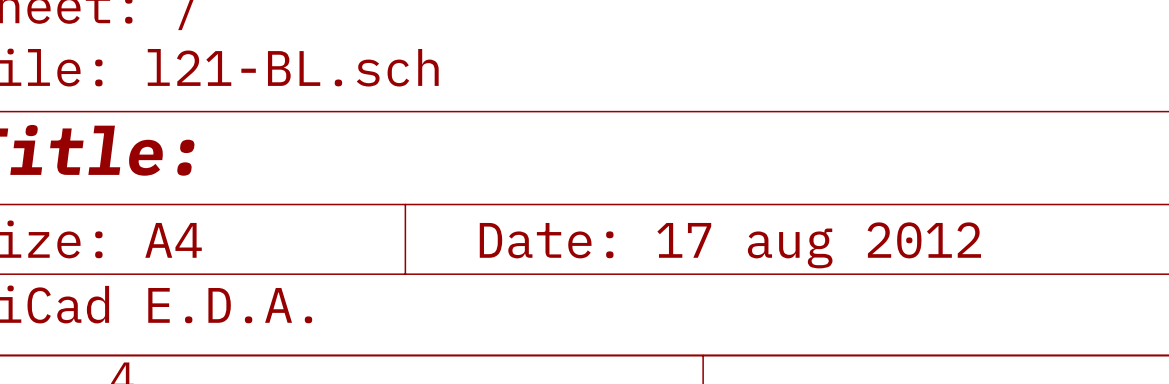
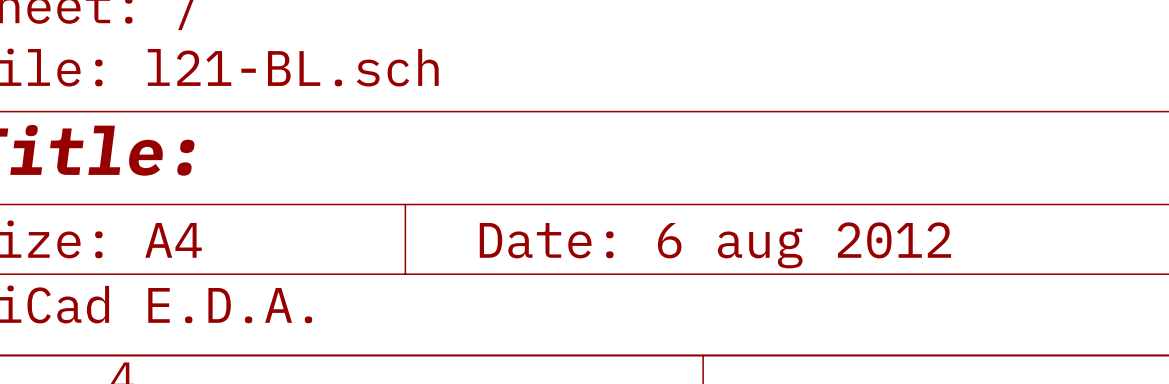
title block: Date: 17 aug 2012 (730, 245) -> Date: 6 aug 2012 (715, 245)

